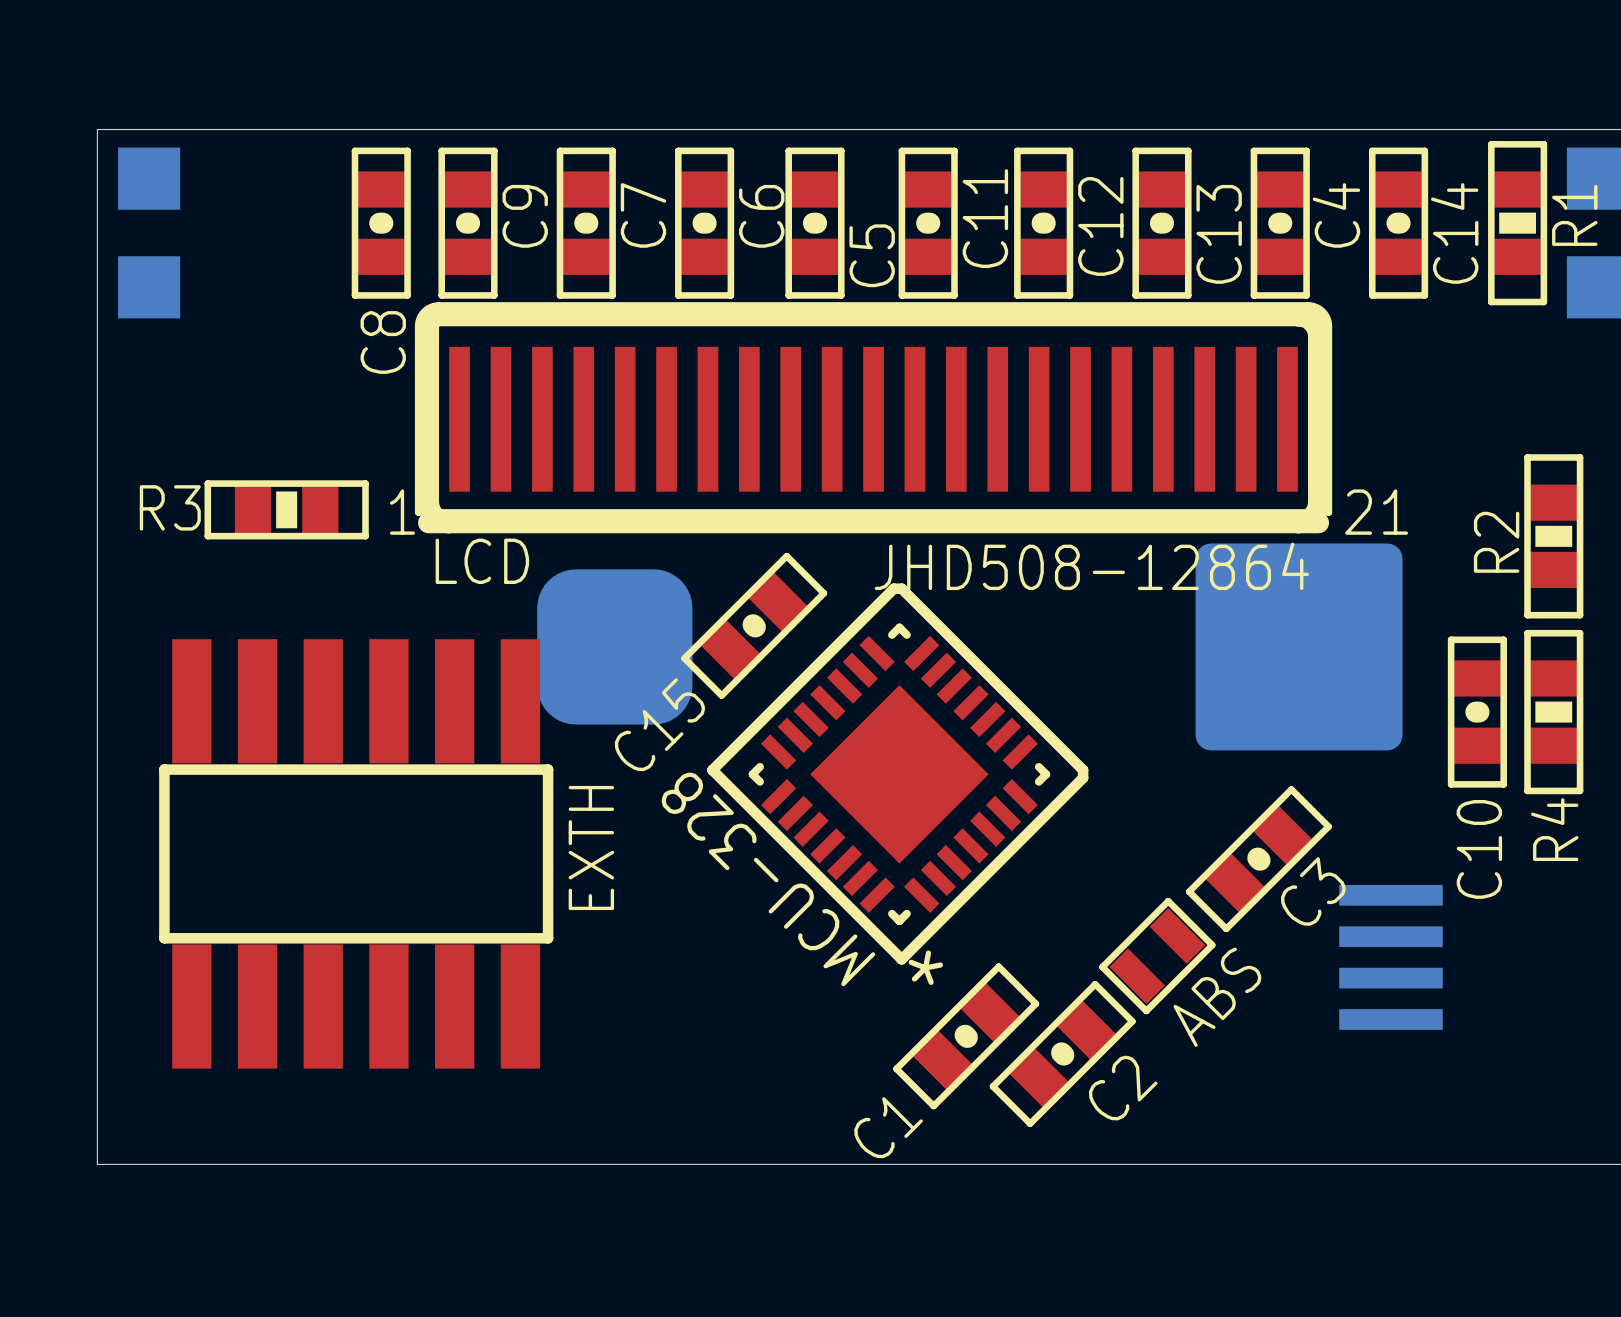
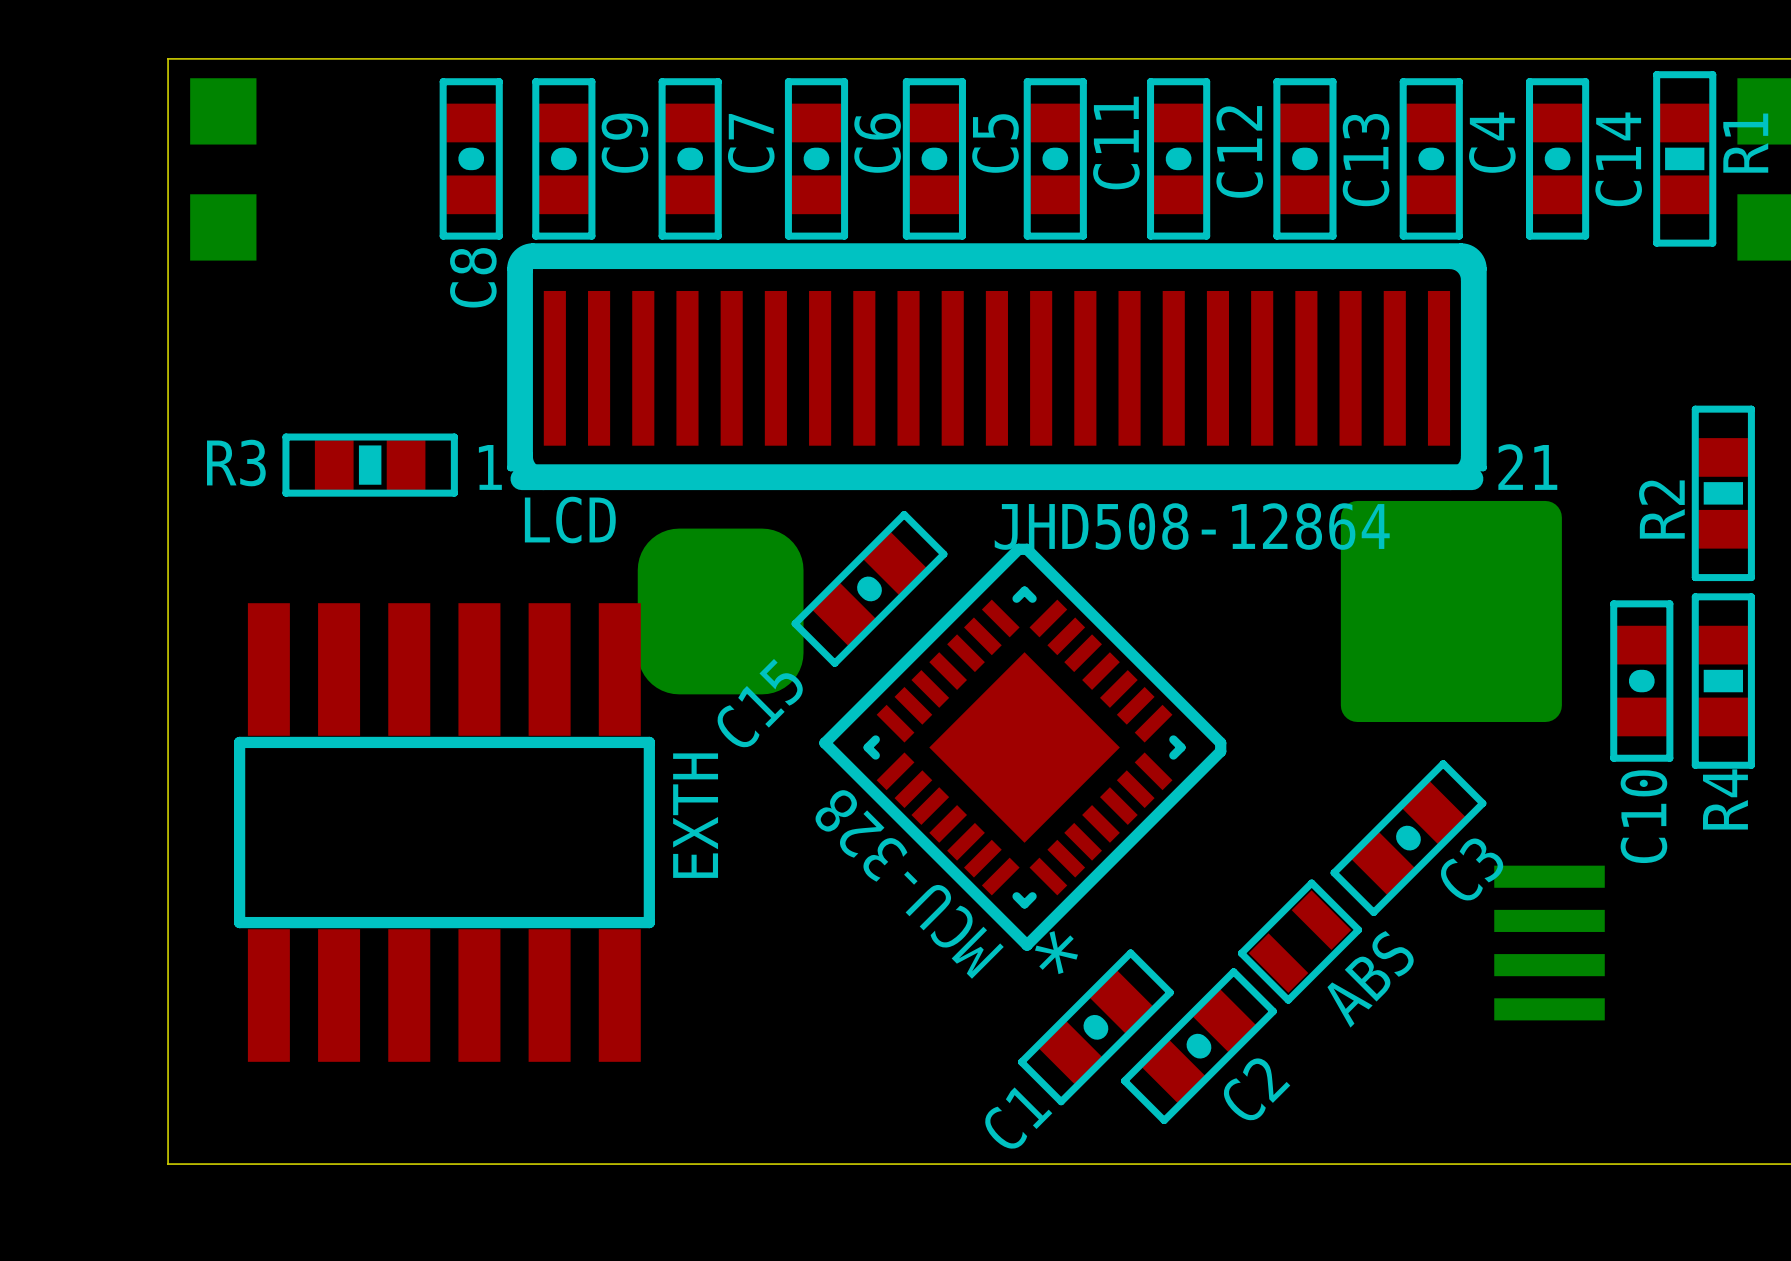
C5 name position: C5 (872, 255) -> C5 (995, 143)

